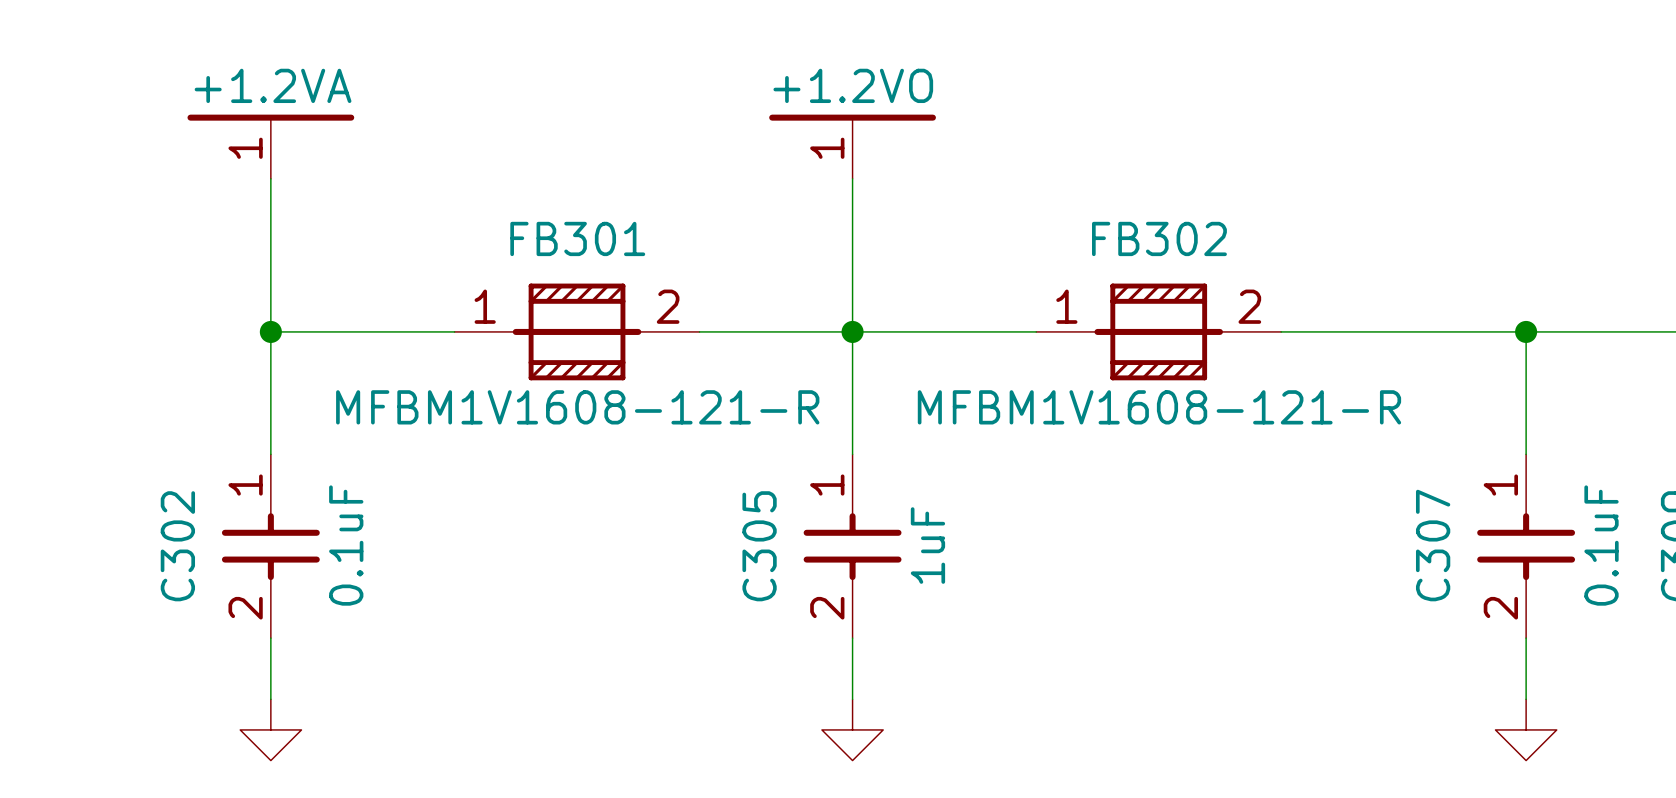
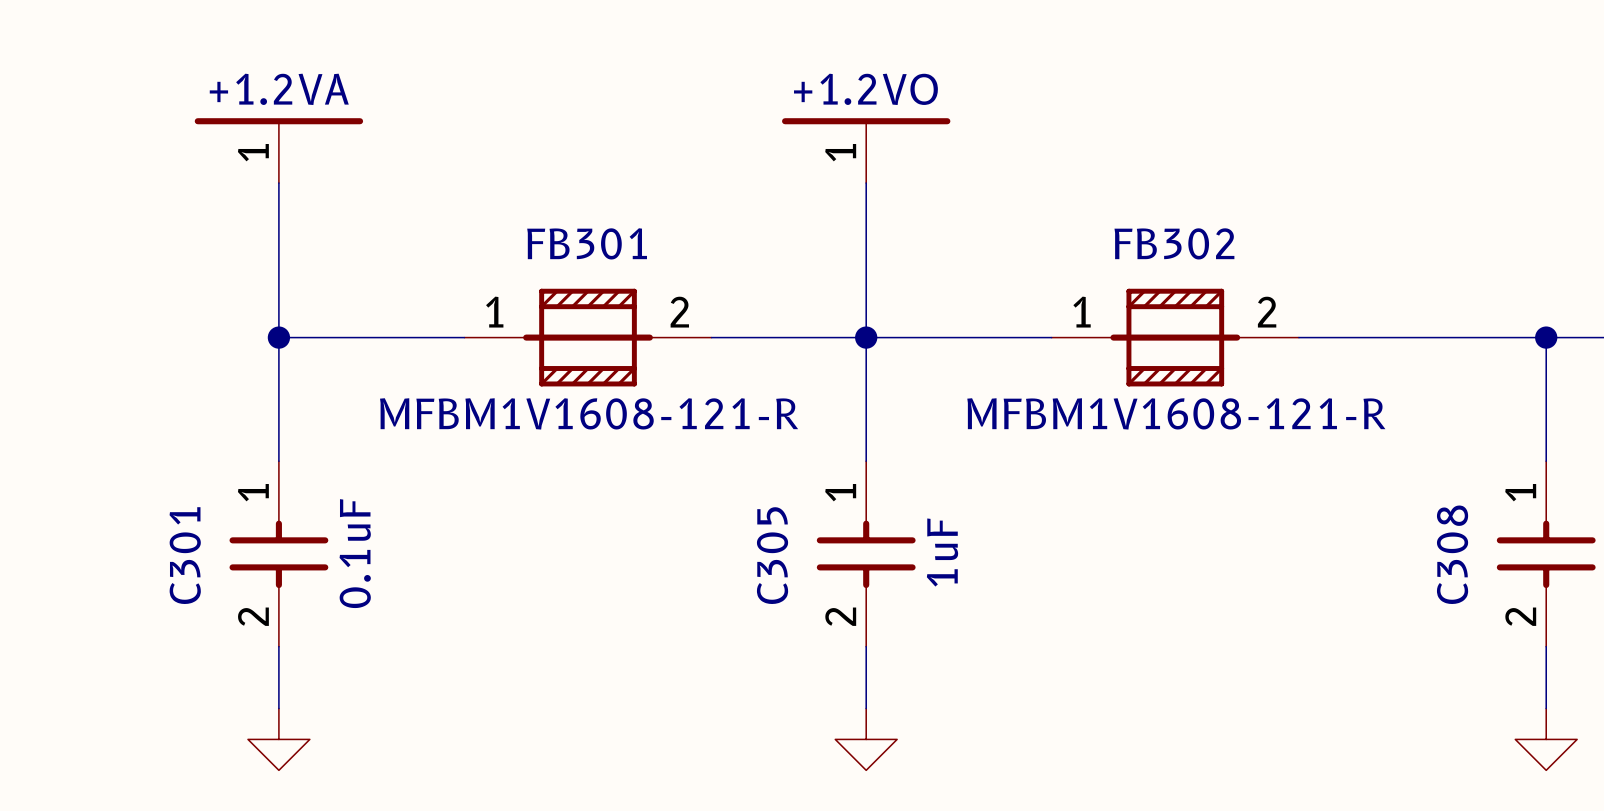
C307 name: C307 (1433, 545) -> C308 (1452, 554)
C302 name: C302 (177, 546) -> C301 (185, 555)

